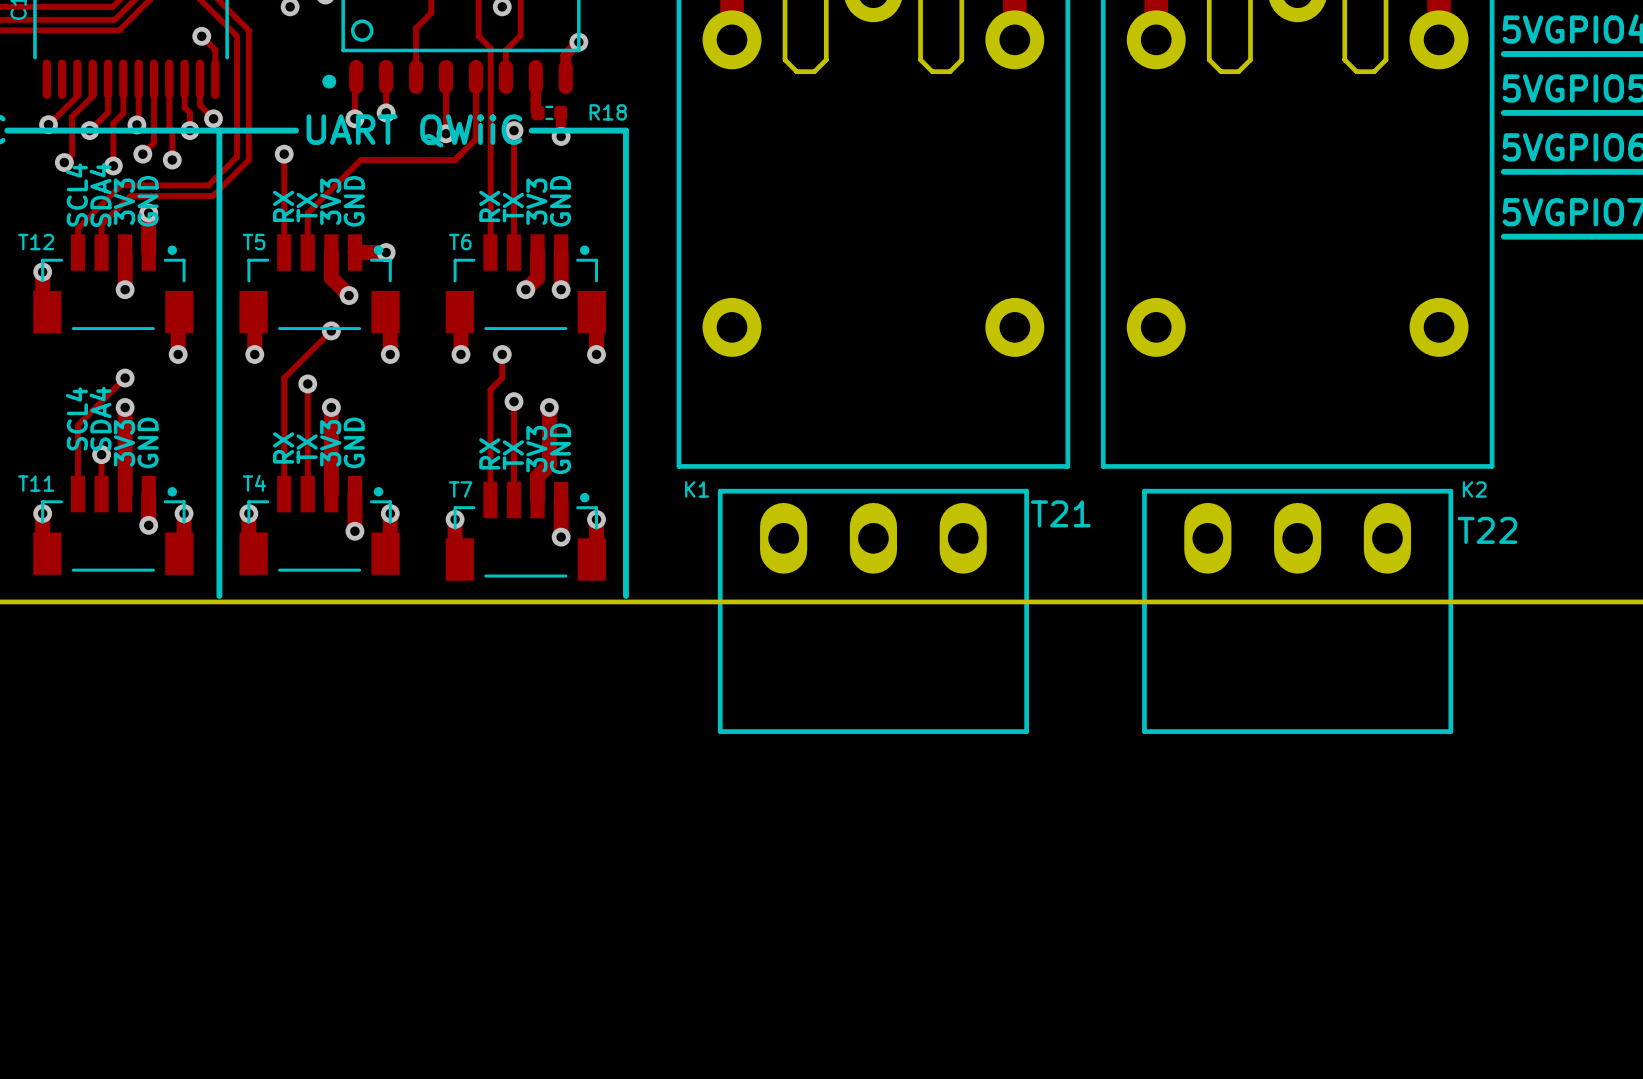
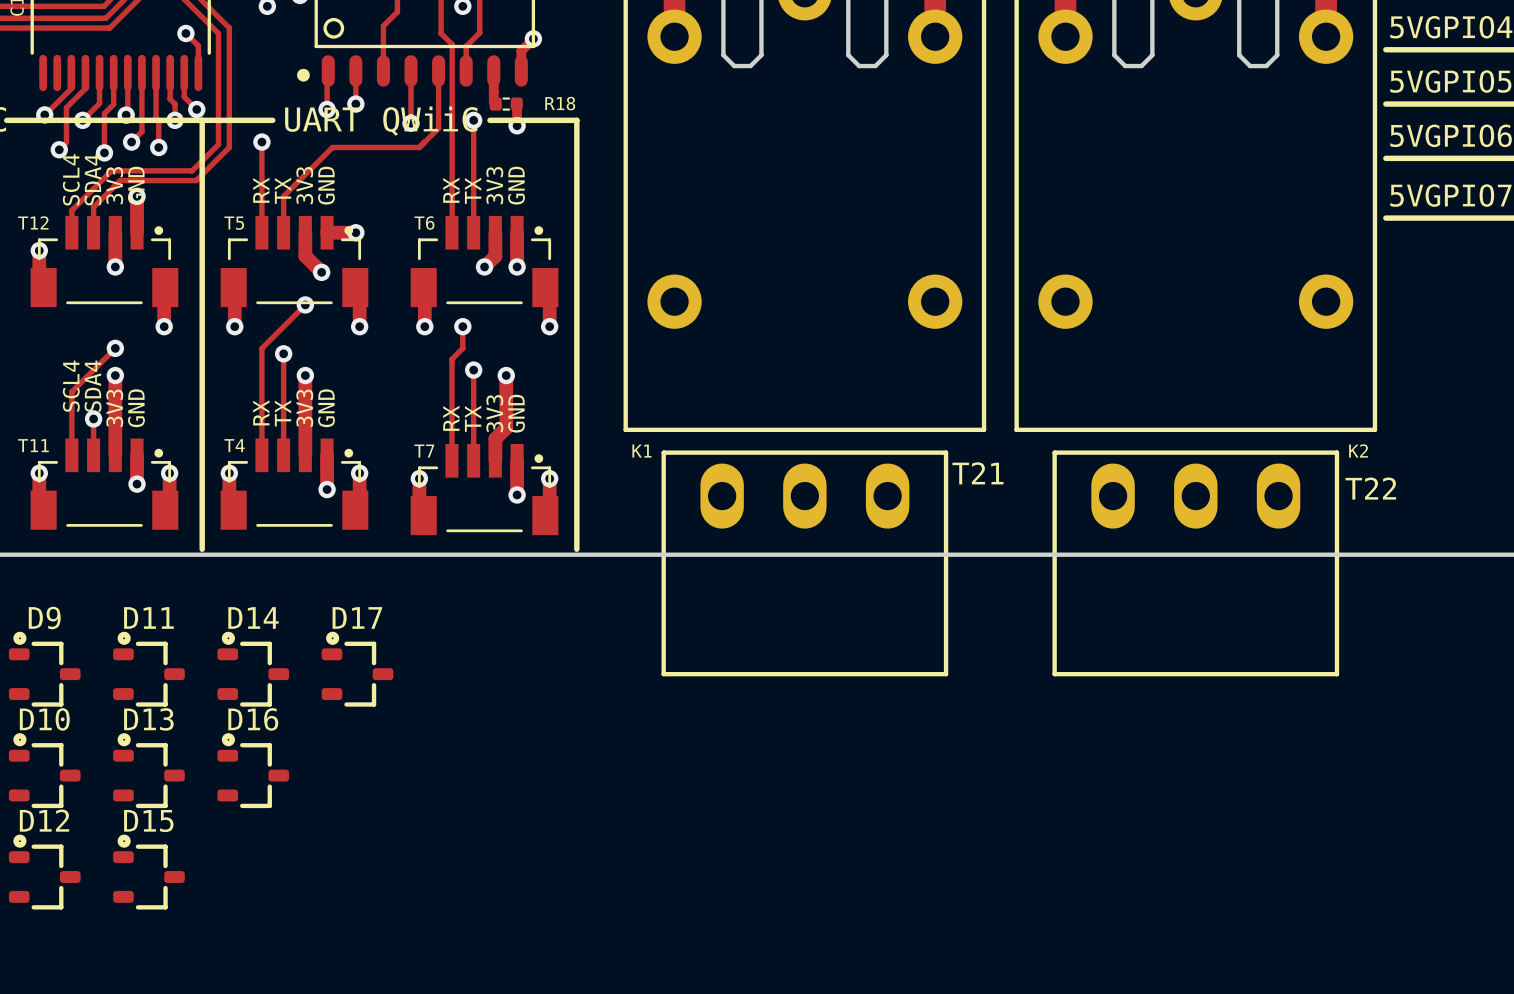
D9: none -> (44, 669)
D11: none -> (148, 669)
D14: none -> (253, 669)
D17: none -> (357, 669)
D10: none -> (44, 770)
D13: none -> (148, 770)
D16: none -> (253, 770)
D12: none -> (44, 872)
D15: none -> (148, 872)

